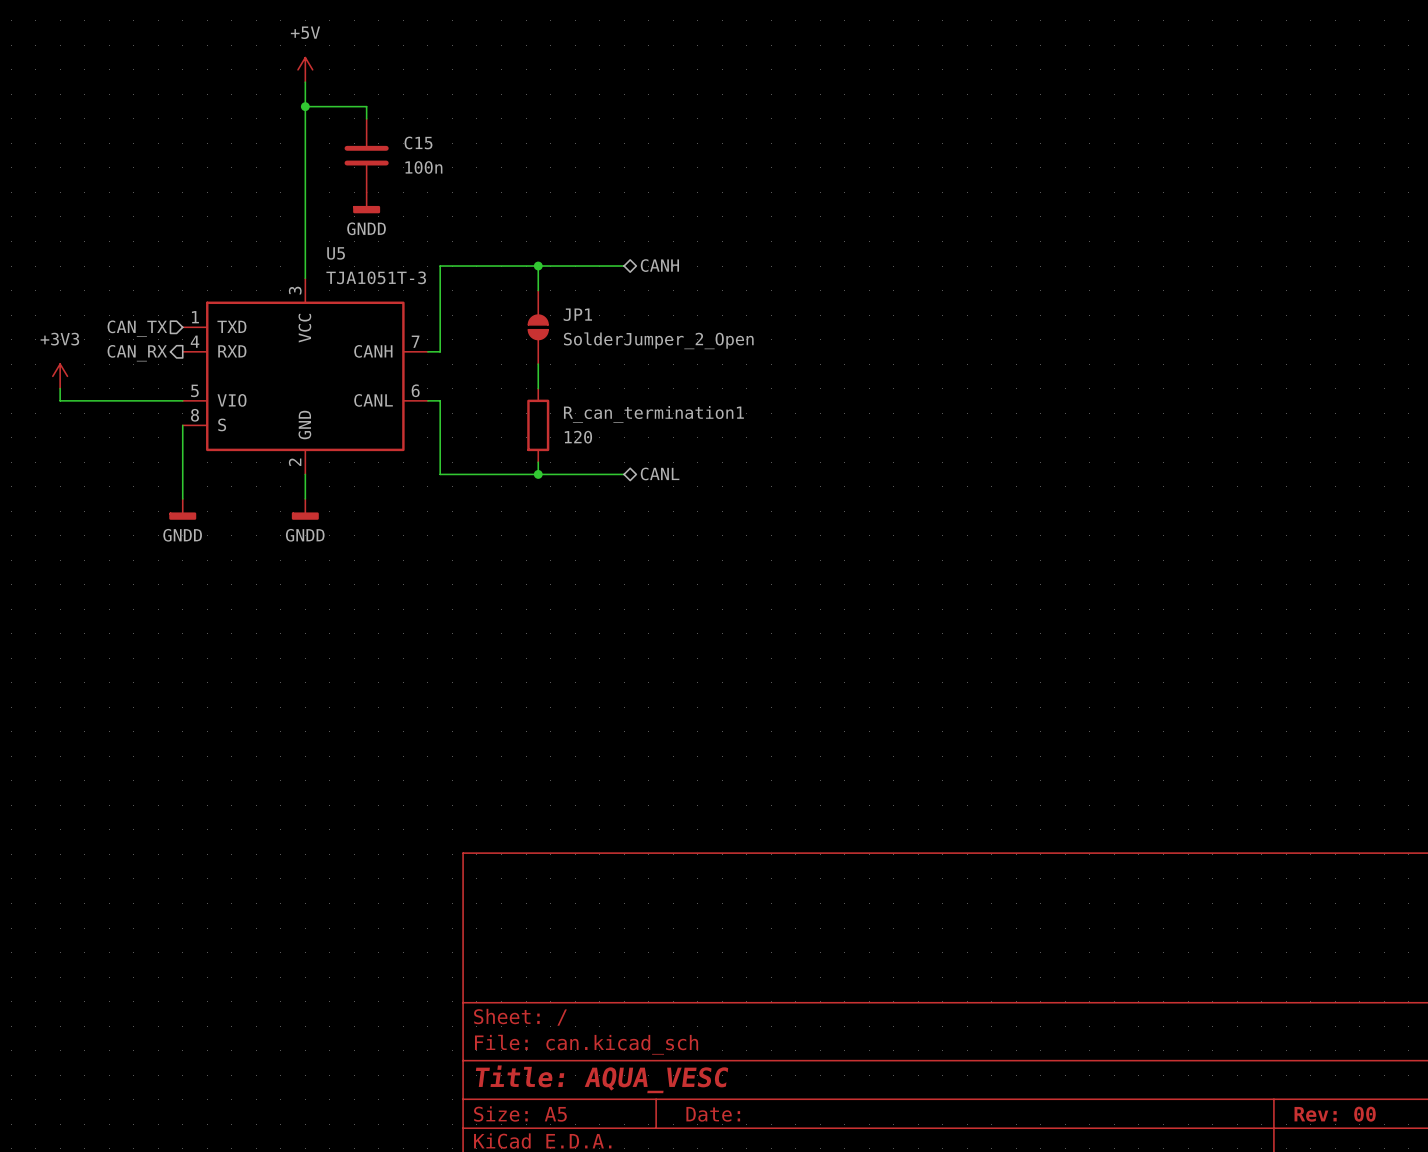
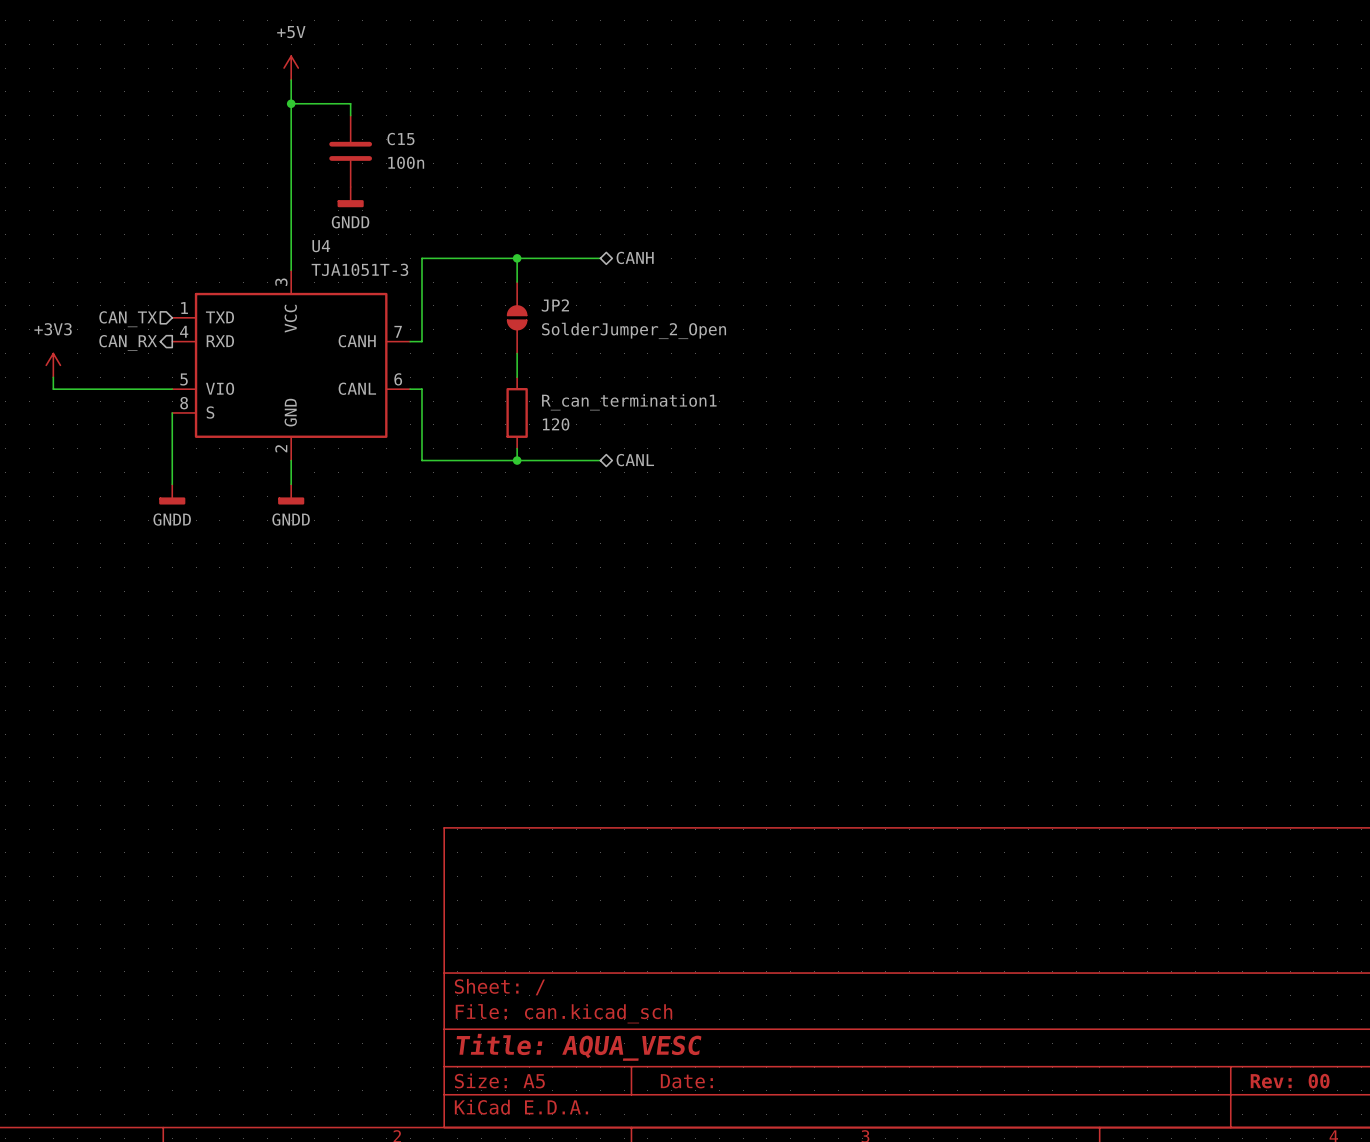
U5 name: U5 (336, 253) -> U4 (321, 246)
JP1 name: JP1 (577, 314) -> JP2 (555, 305)

